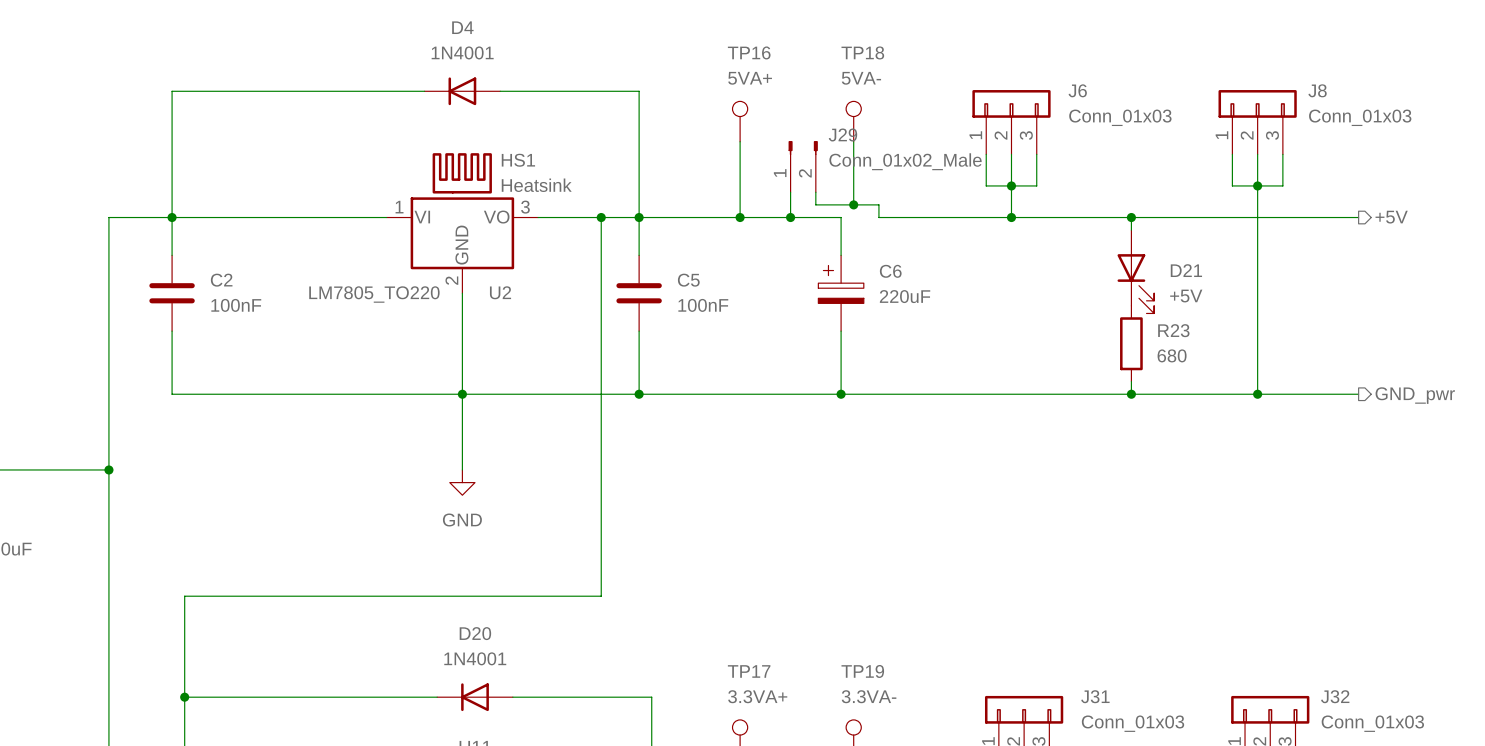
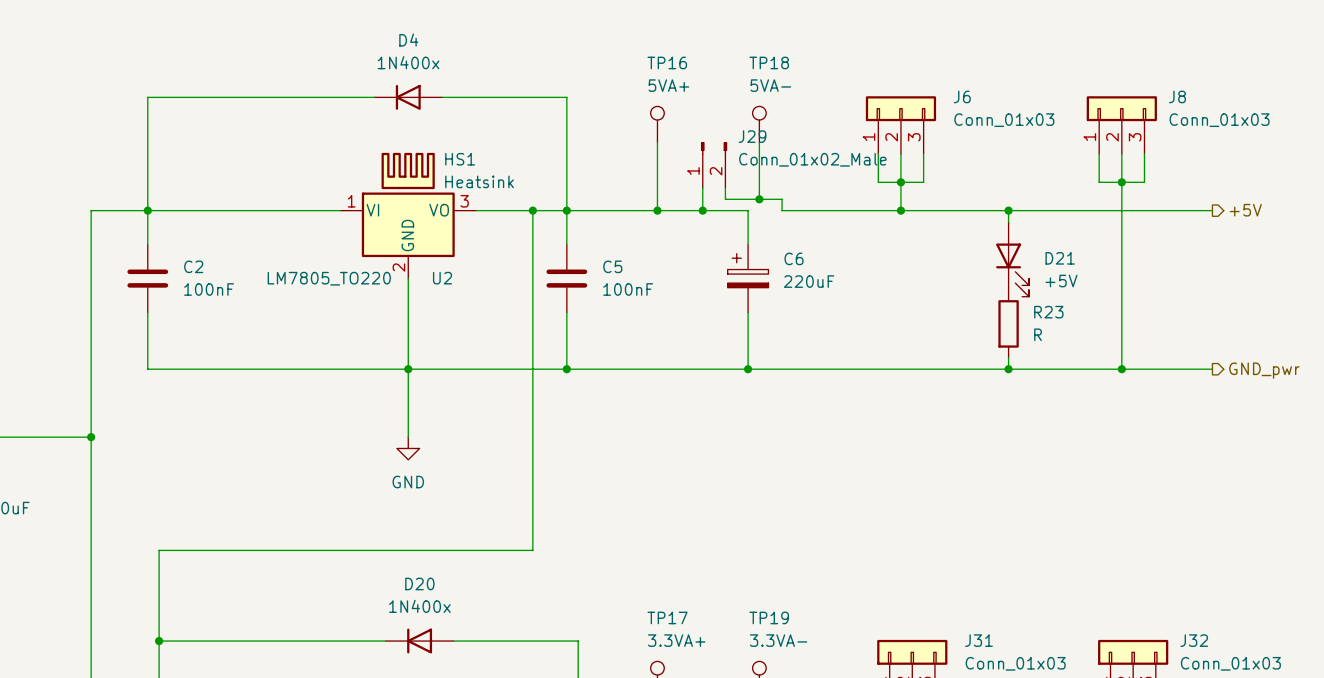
D4 value: 1N4001 (462, 52) -> 1N400x (408, 62)
R23 value: 680 (1172, 355) -> R (1038, 334)
D20 value: 1N4001 (475, 658) -> 1N400x (419, 606)

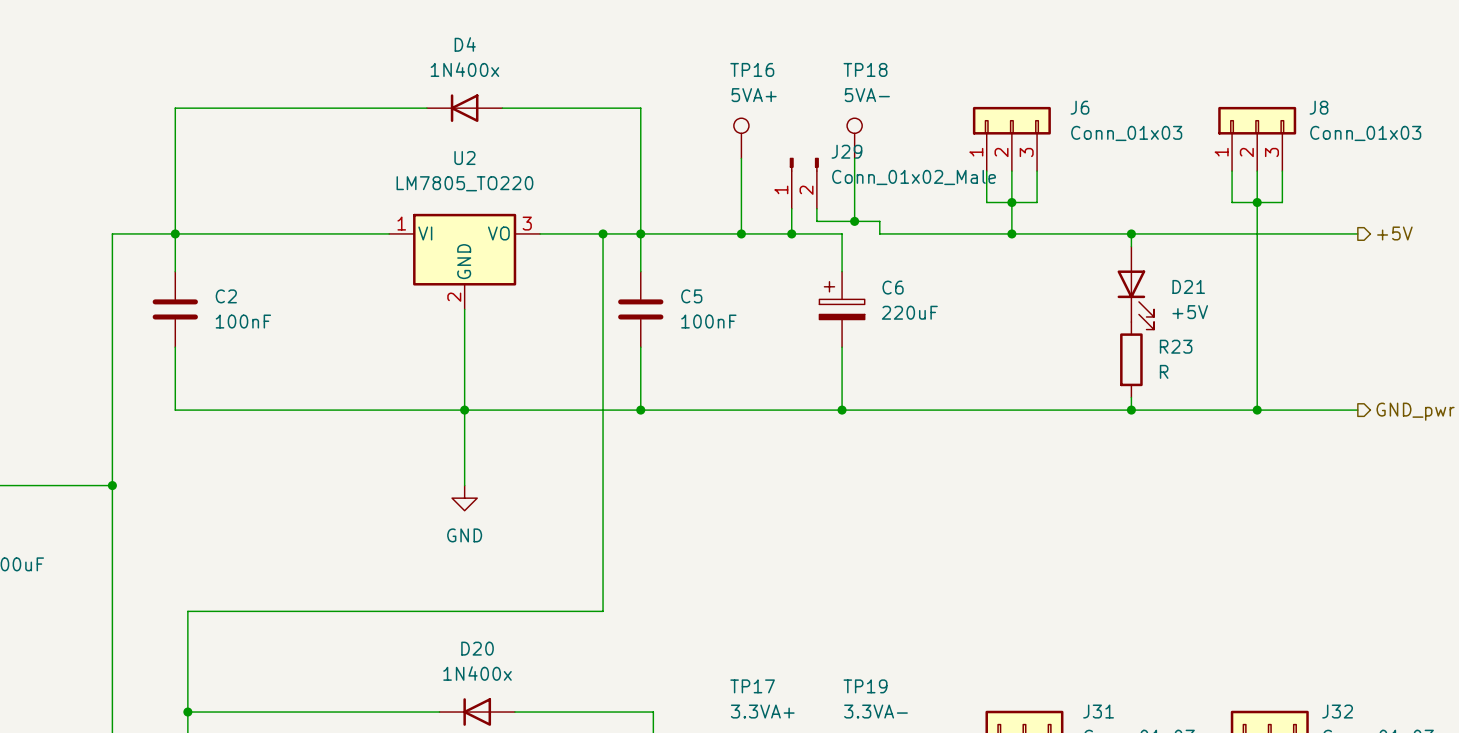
HS1: Heatsink (408, 170) -> none
U2 value position: LM7805_TO220 (329, 278) -> LM7805_TO220 (464, 183)
U2 name position: U2 (442, 278) -> U2 (464, 158)

